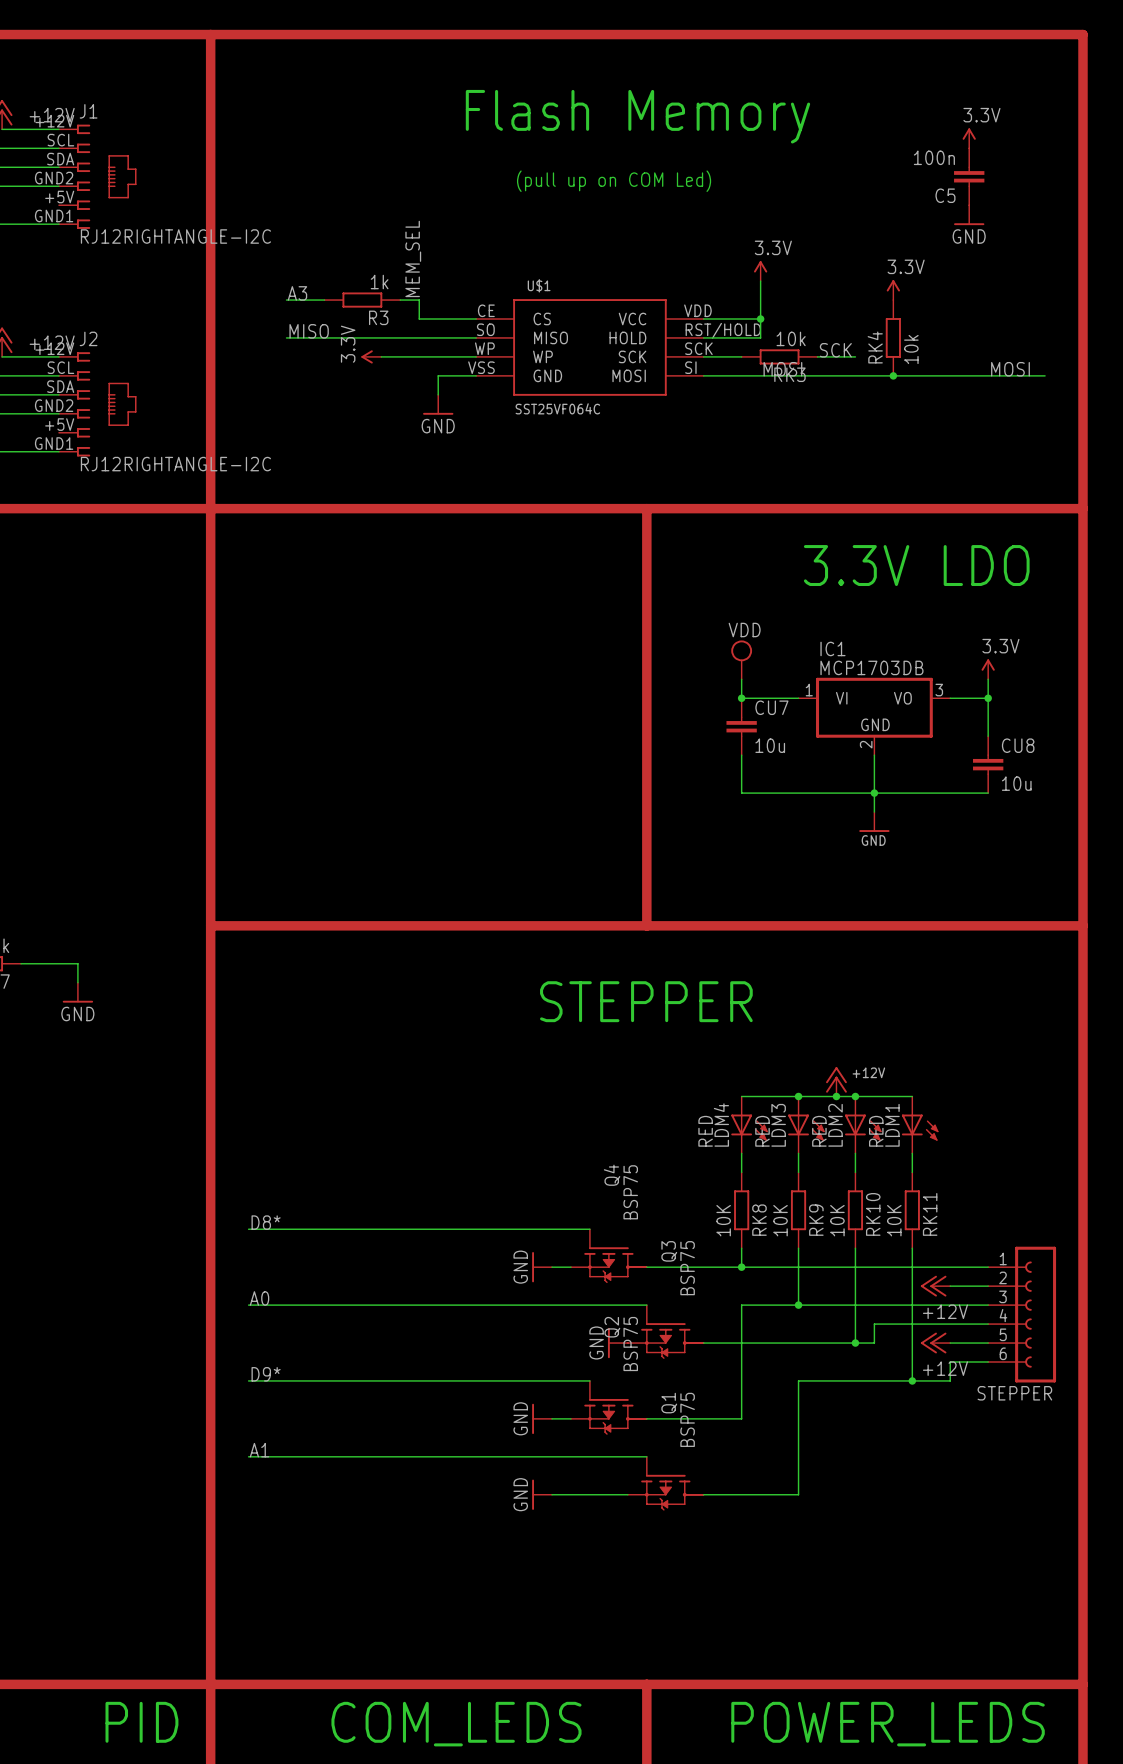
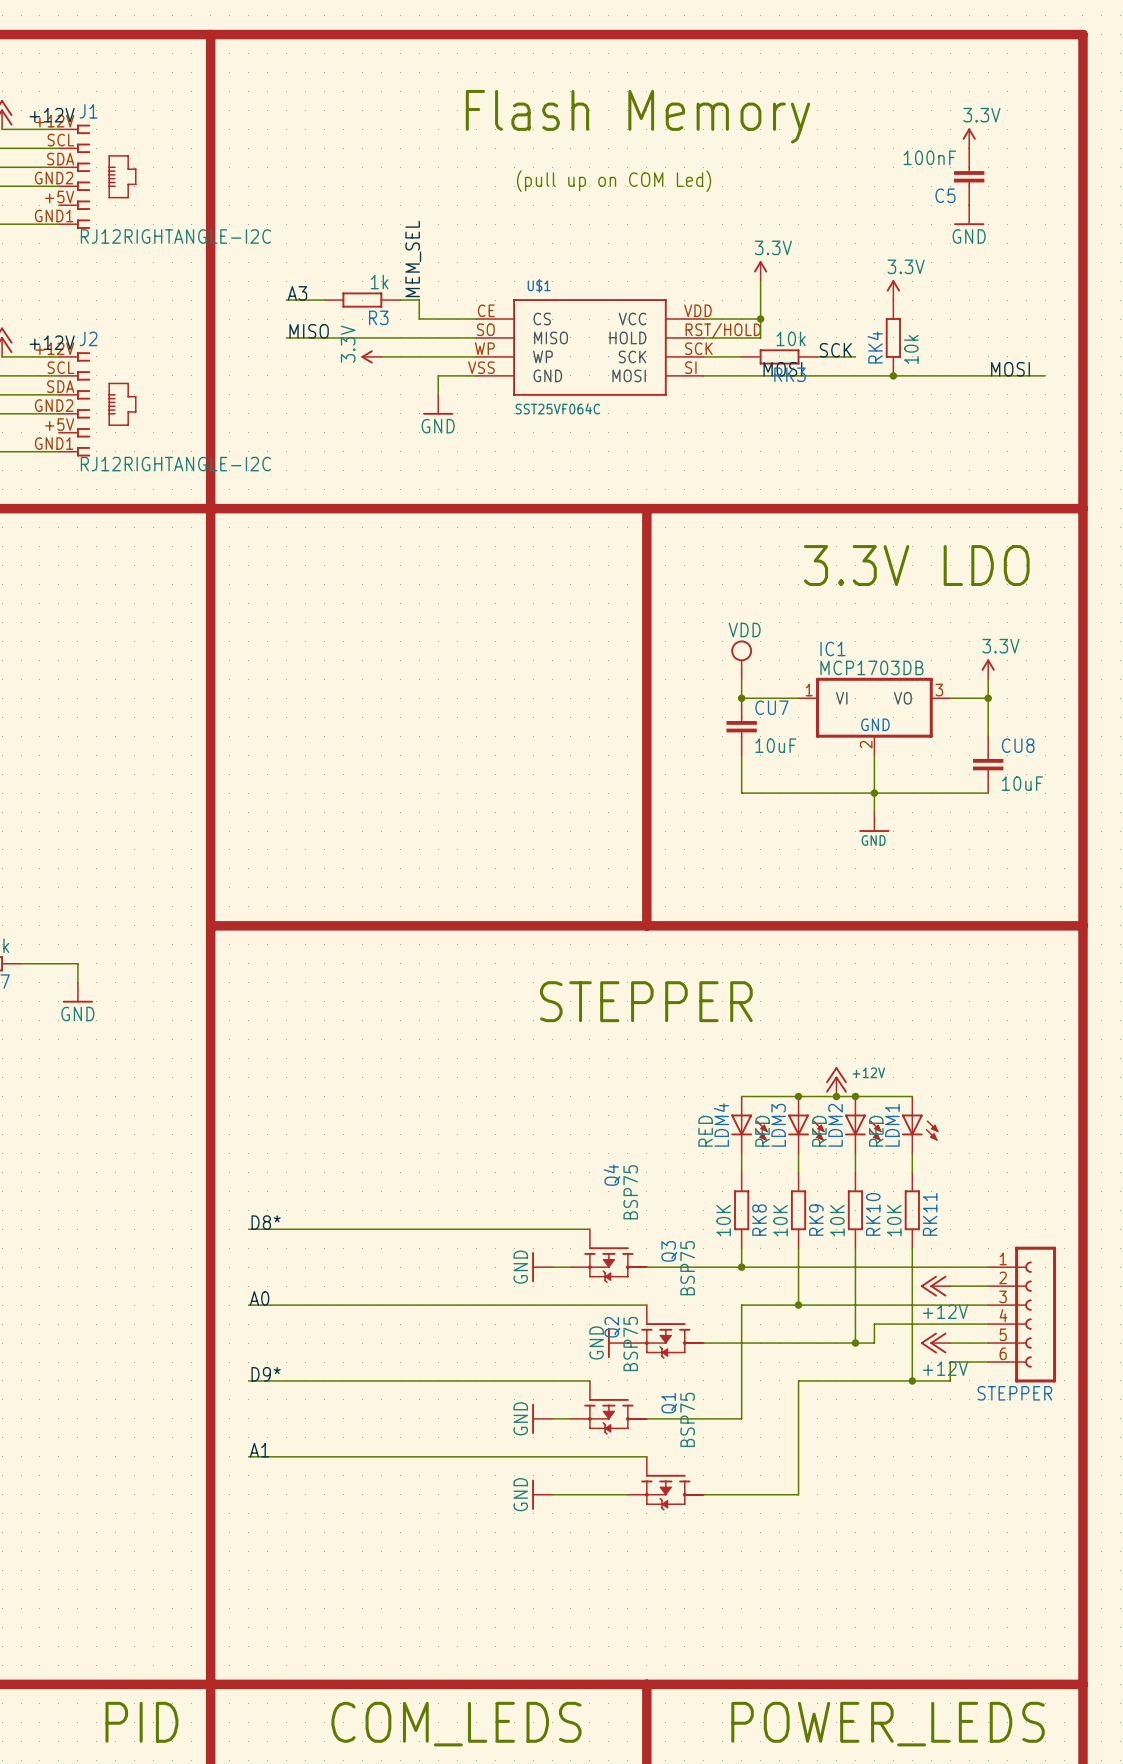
C5 value: 100n (934, 157) -> 100nF (929, 157)
CU7 value: 10u (770, 745) -> 10uF (775, 745)
CU8 value: 10u (1016, 783) -> 10uF (1022, 783)

